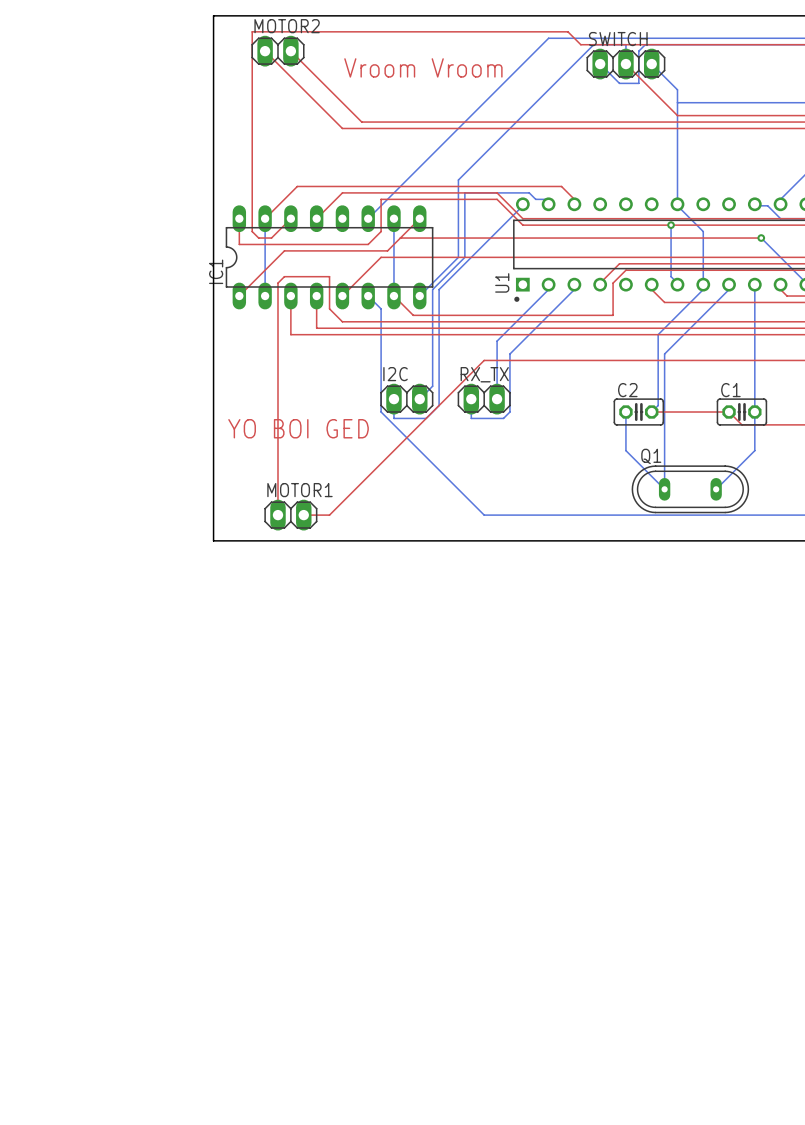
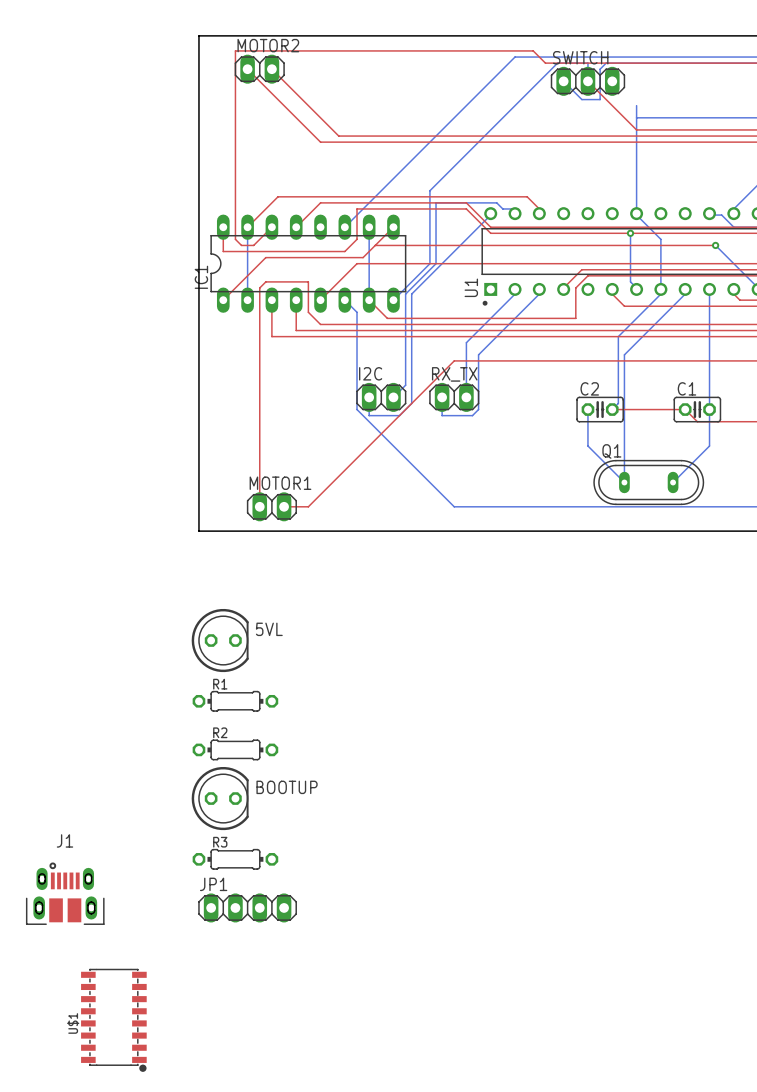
bottom track: (651, 64) (677, 89) -> none
text: Vroom Vroom (423, 67) -> none
text: YO BOI GED (298, 428) -> none
5VL: none -> (220, 640)
R1: none -> (235, 701)
R2: none -> (235, 749)
BOOTUP: none -> (220, 798)
R3: none -> (235, 859)
J1: none -> (65, 893)
JP1: none -> (247, 907)
U$1: none -> (113, 1020)

